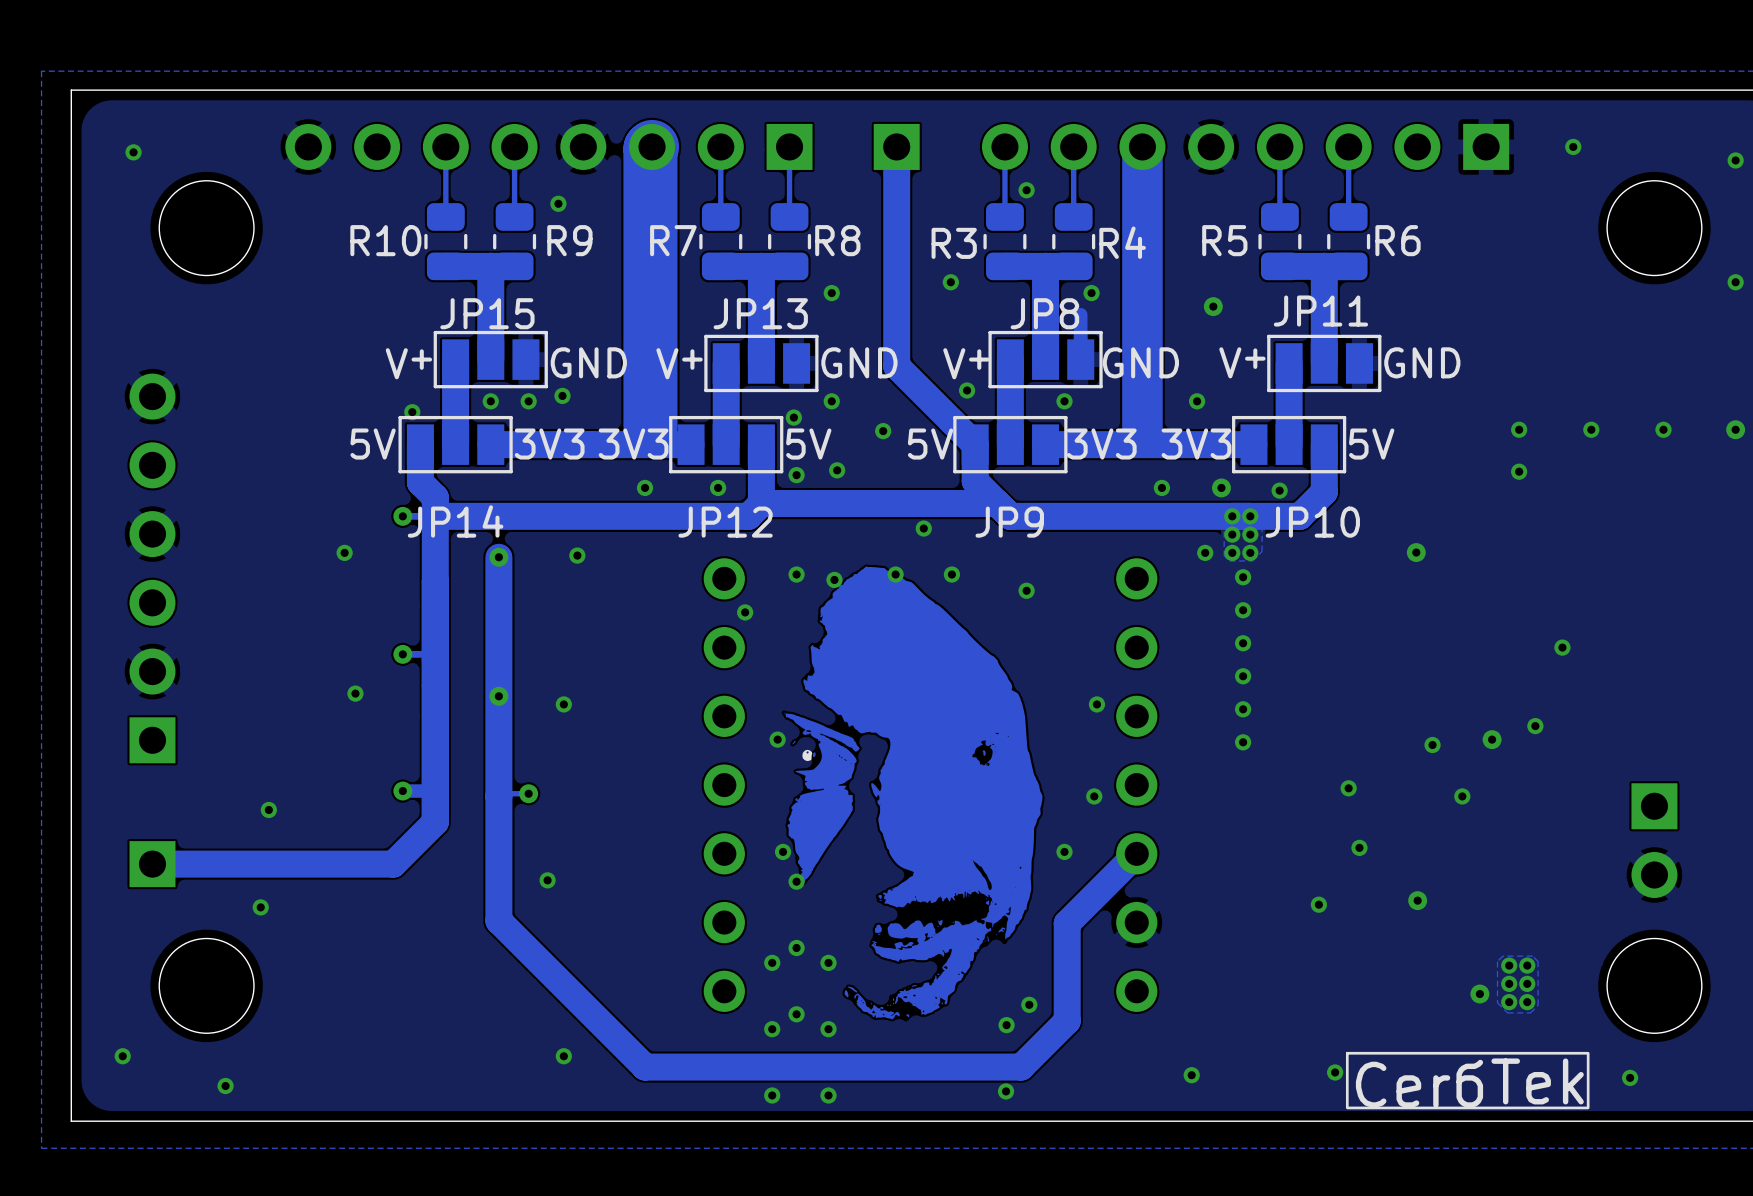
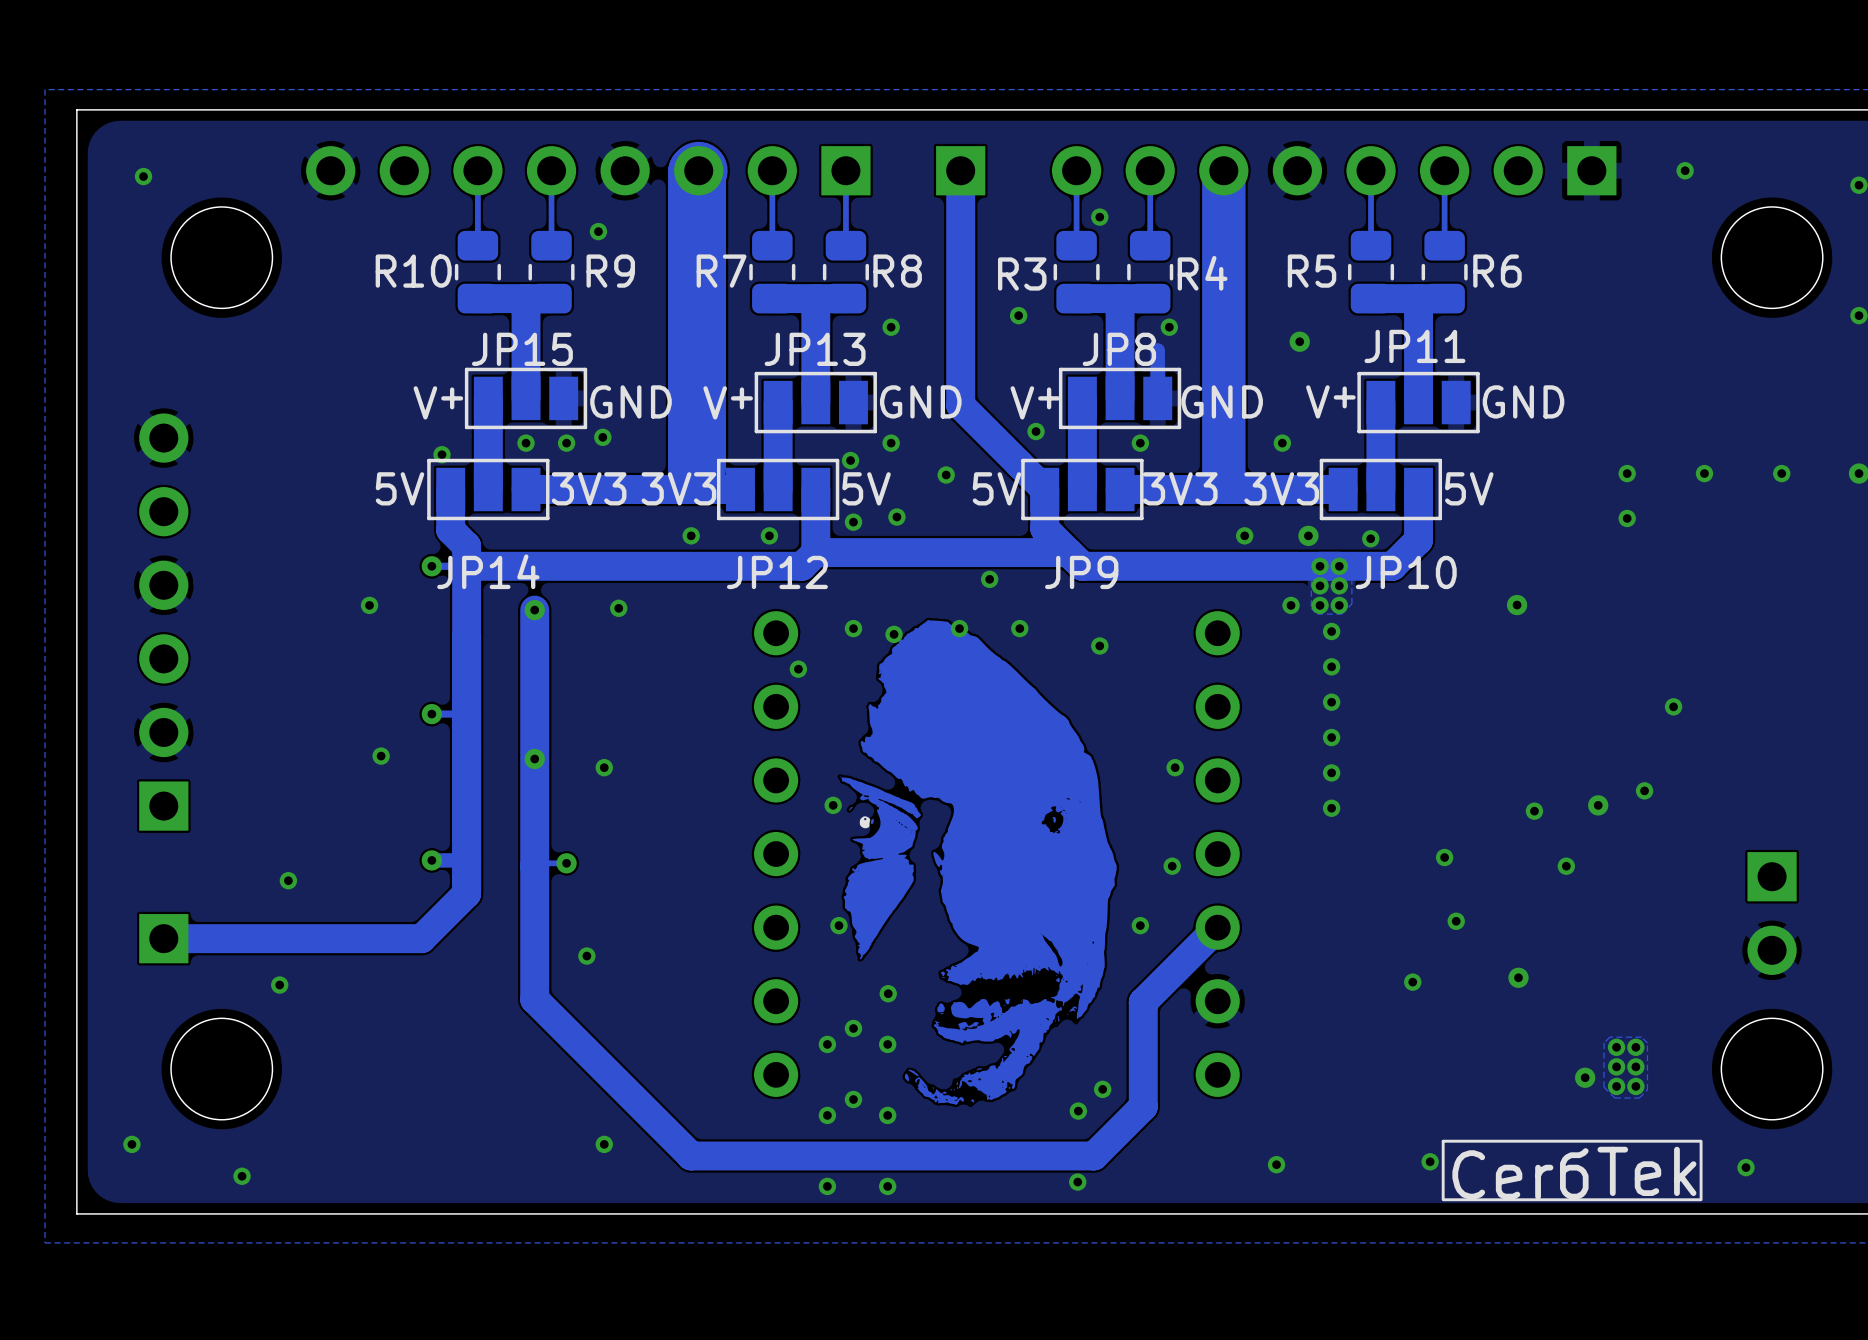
via position: (796, 881) -> (888, 993)

